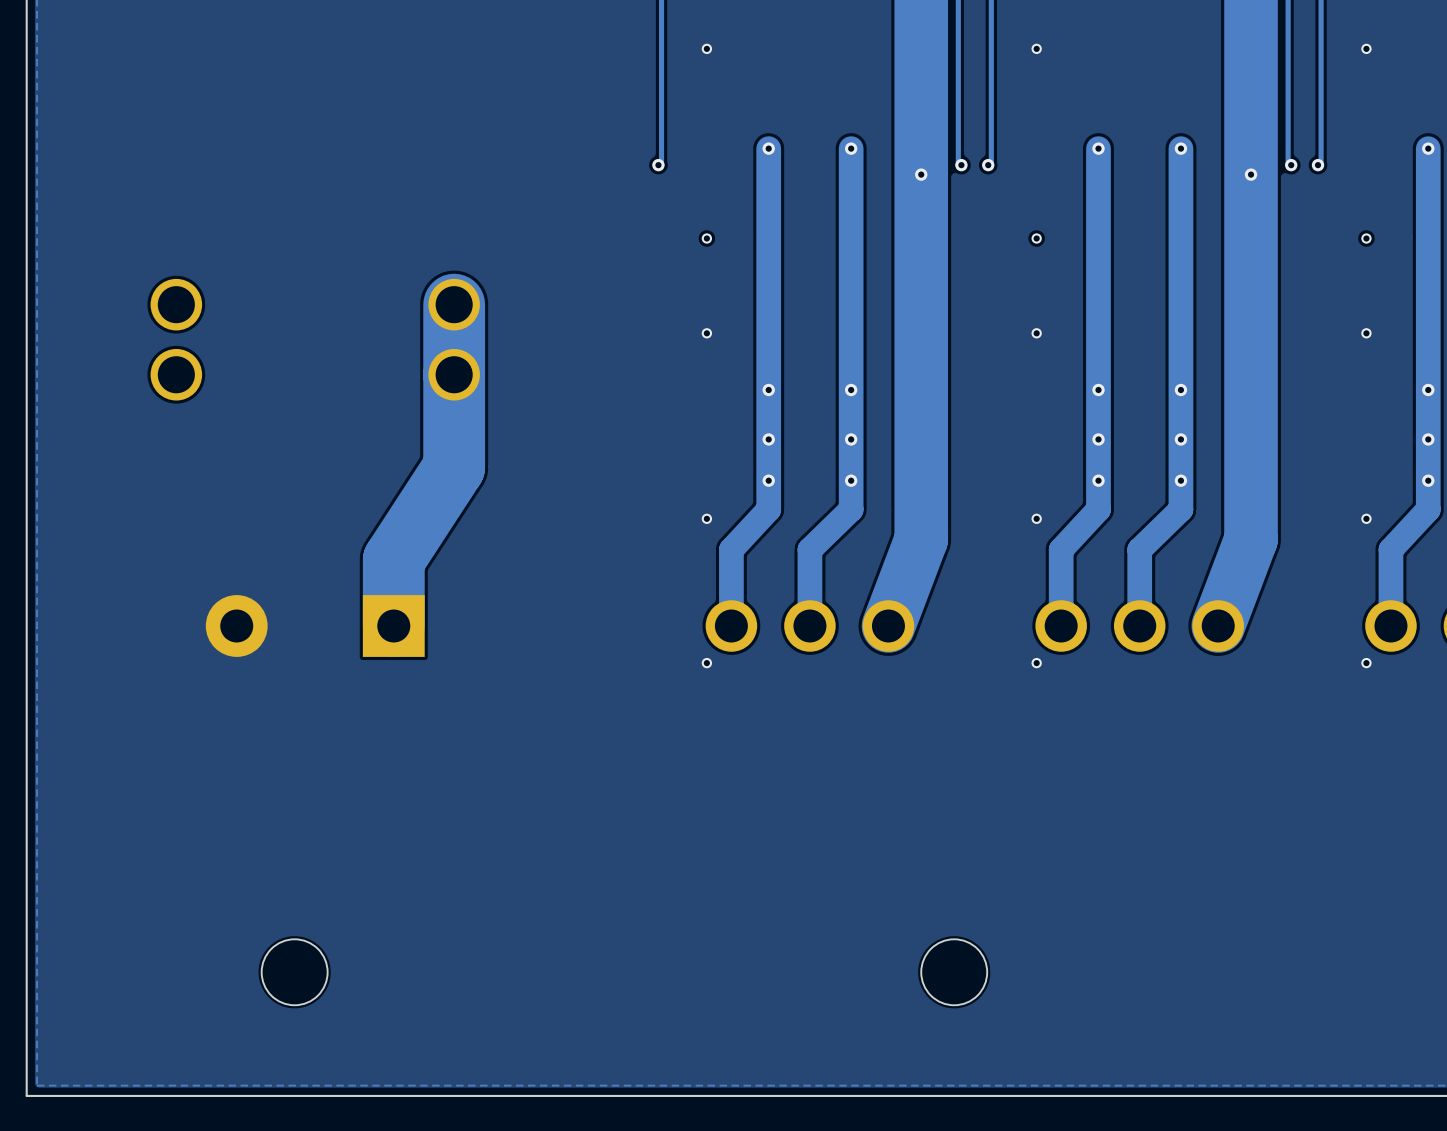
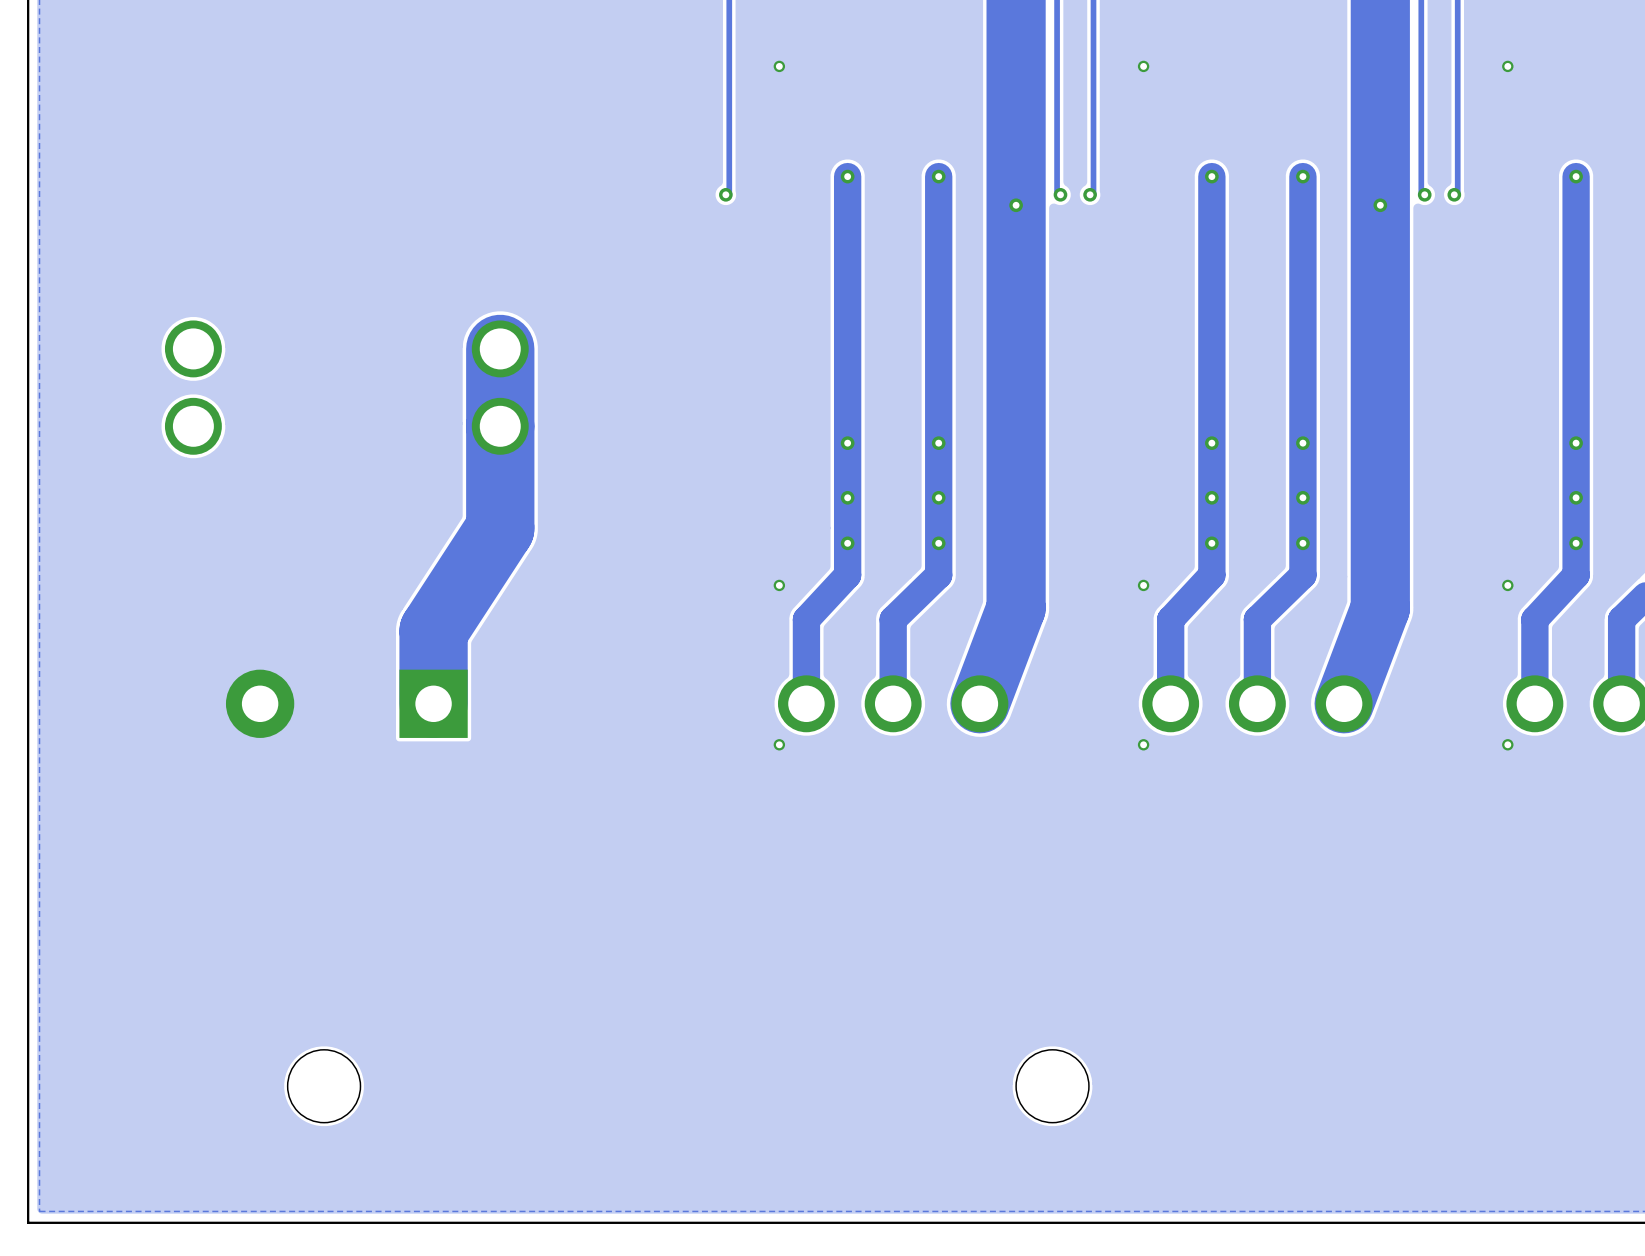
via: (706, 238) -> none
via: (1036, 238) -> none
via: (1366, 238) -> none
via: (706, 333) -> none
via: (1036, 333) -> none
via: (1366, 333) -> none

